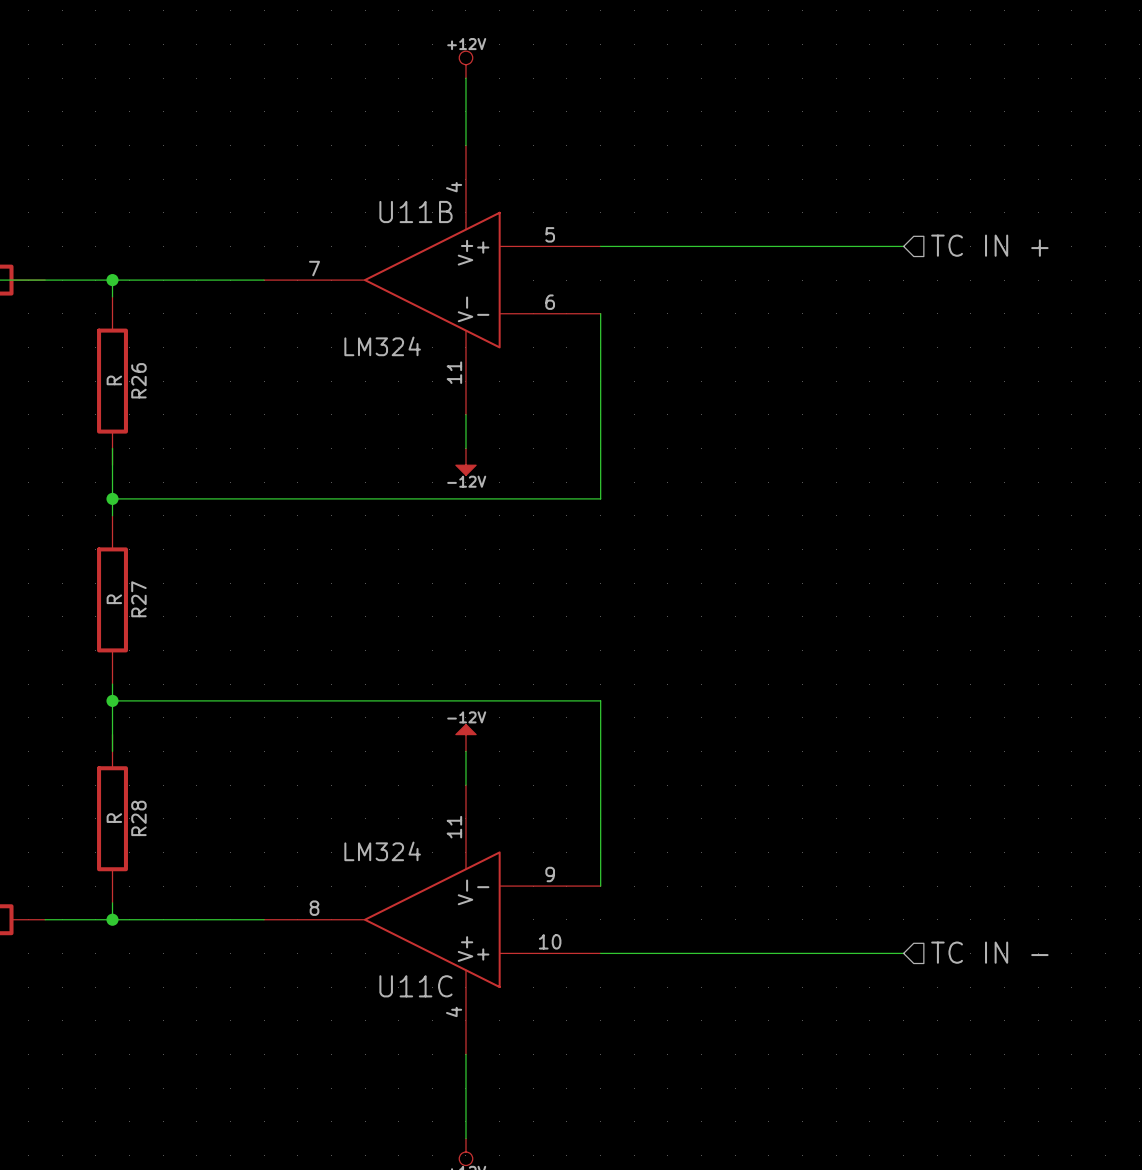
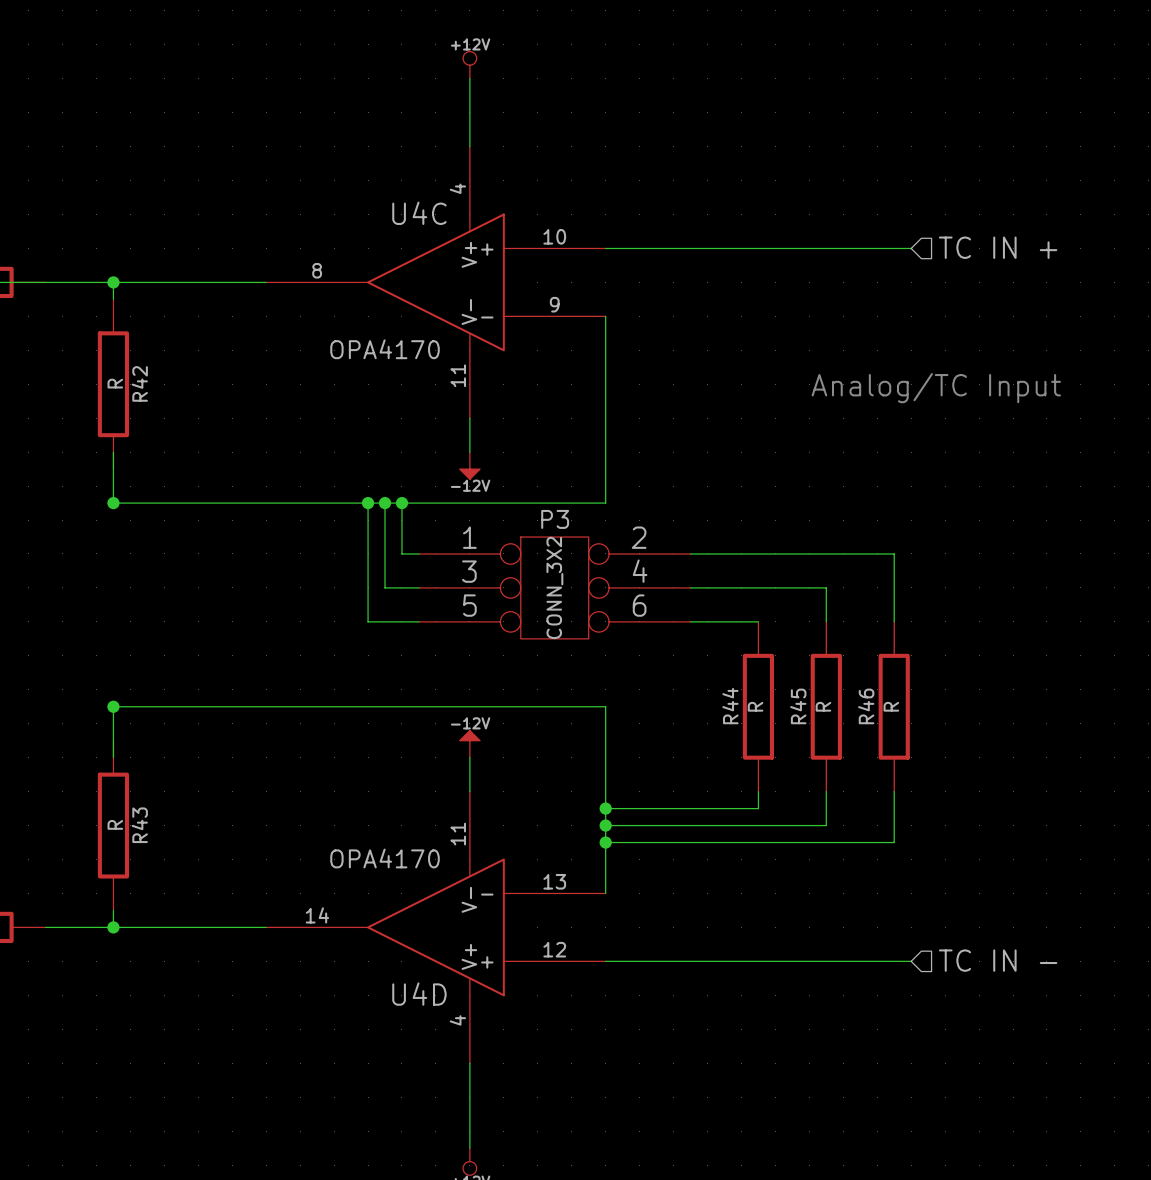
U11B name: U11B (415, 212) -> U4C (419, 213)
U11B pin number: 5 (550, 234) -> 10 (554, 236)
U11B pin number: 7 (314, 268) -> 8 (317, 270)
U11B pin number: 6 (550, 302) -> 9 (554, 304)
U11B value: LM324 (382, 346) -> OPA4170 (385, 349)
R26 name: R26 (138, 380) -> R42 (139, 383)
text: none -> Analog/TC Input (936, 388)
wire: (112, 498) (112, 515) -> none
wire: none -> (368, 503) (368, 621) (418, 621)
junction: none -> (368, 503)
wire: none -> (385, 503) (385, 587) (418, 587)
junction: none -> (385, 503)
wire: none -> (401, 503) (401, 553) (418, 553)
junction: none -> (401, 503)
wire: none -> (690, 553) (894, 553) (894, 621)
P3: none -> CONN_3X2 (554, 587)
wire: none -> (690, 587) (826, 587) (826, 621)
R27: R (112, 599) -> none
wire: none -> (690, 621) (758, 621)
wire: (112, 684) (112, 700) -> none
R44: none -> R (758, 706)
R45: none -> R (826, 706)
R46: none -> R (894, 706)
wire: none -> (758, 791) (758, 808) (605, 808)
wire: none -> (826, 791) (826, 825) (605, 825)
wire: none -> (894, 791) (894, 842) (605, 842)
junction: none -> (605, 808)
R28 name: R28 (138, 818) -> R43 (139, 825)
junction: none -> (605, 825)
junction: none -> (605, 842)
U11C value: LM324 (382, 851) -> OPA4170 (385, 858)
U11C pin number: 9 (550, 874) -> 13 (554, 881)
U11C pin number: 8 (314, 908) -> 14 (317, 915)
U11C pin number: 10 (550, 941) -> 12 (554, 949)
U11C name: U11C (415, 986) -> U4D (419, 994)

